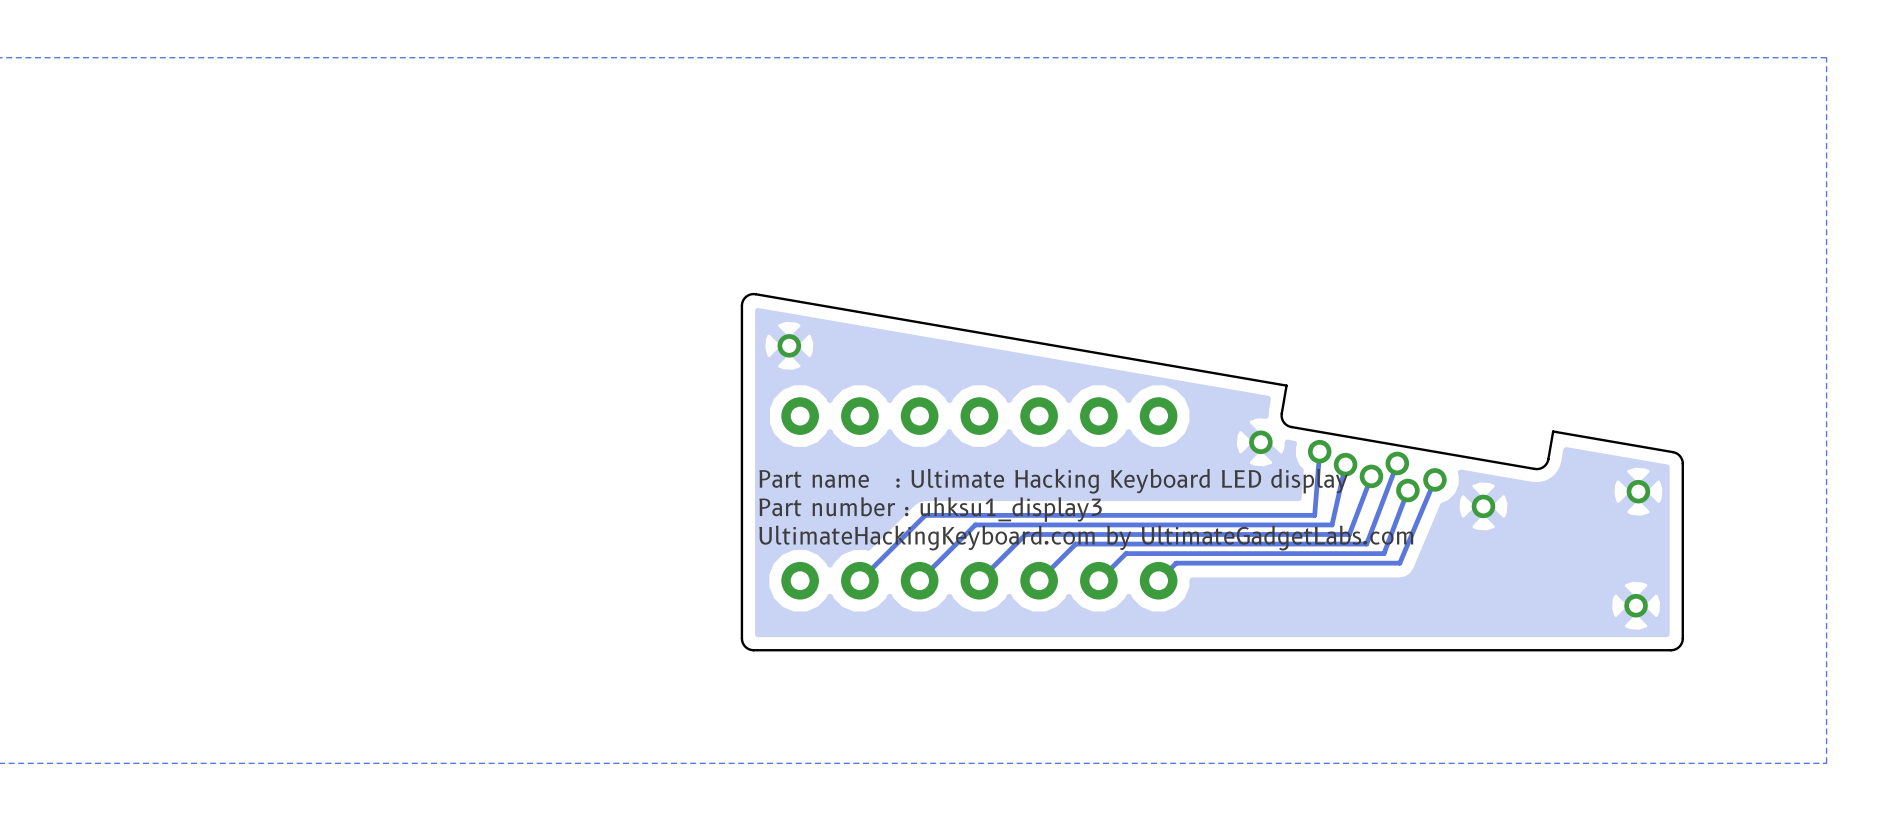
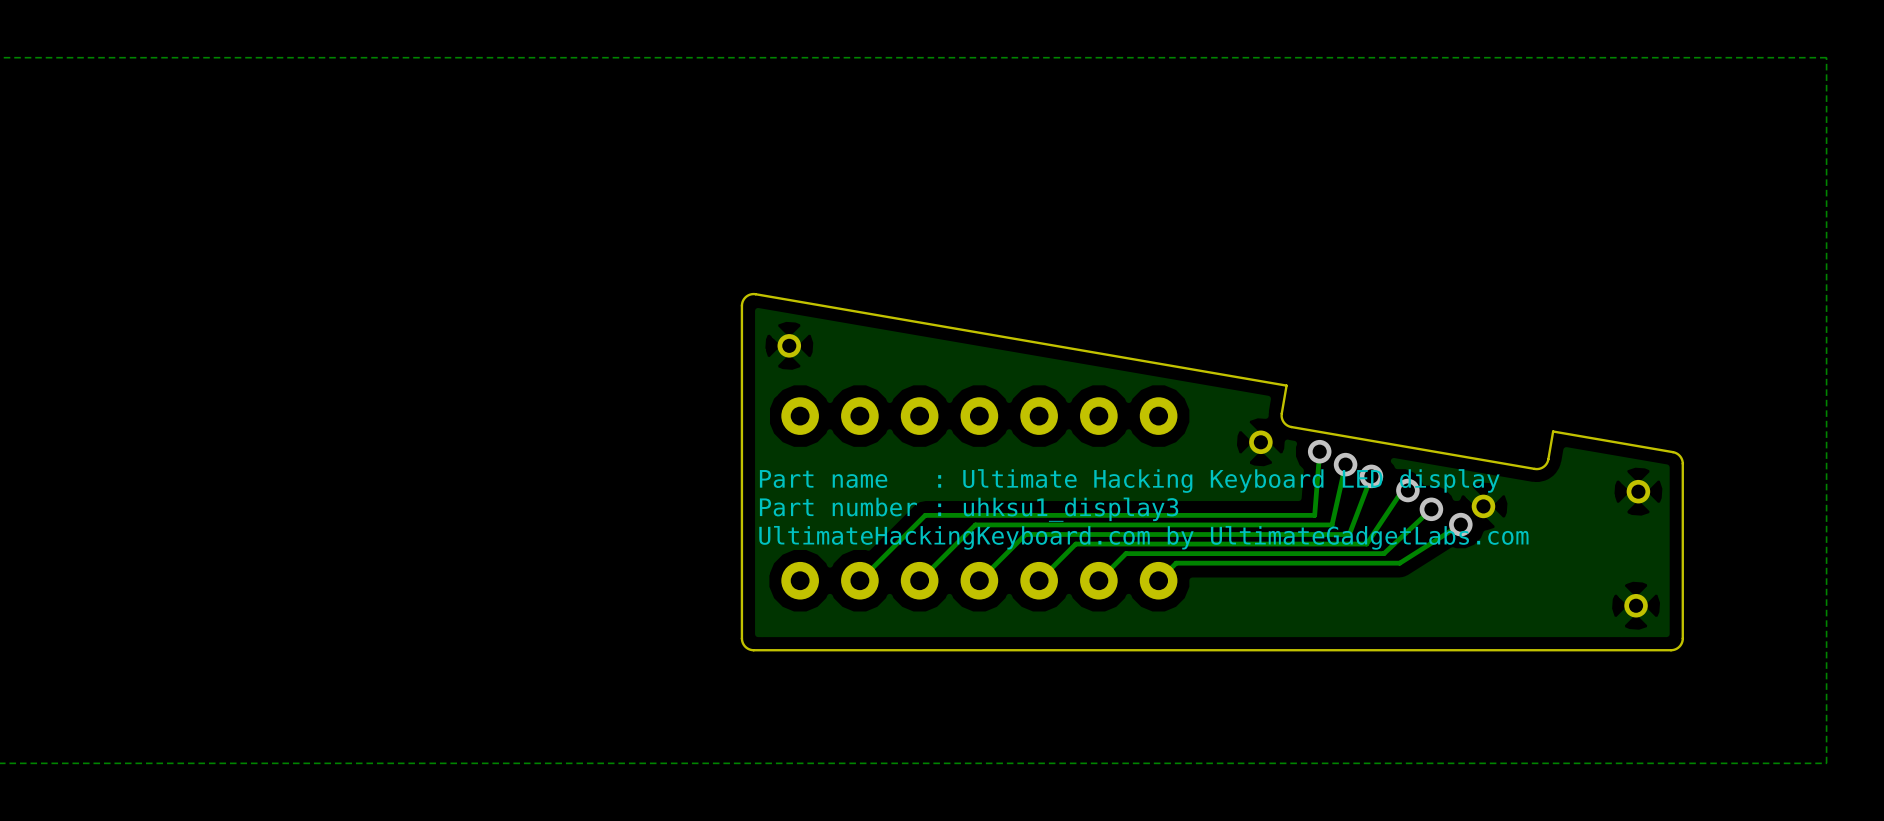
track: (1397, 463) (1366, 544) -> (1400, 492) (1366, 544)
via: (1397, 463) -> none
track: (1434, 479) (1399, 563) -> (1460, 524) (1399, 563)
via: (1434, 479) -> none
track: (1407, 490) (1384, 553) -> (1431, 509) (1384, 553)
via: none -> (1431, 509)
via: none -> (1460, 524)

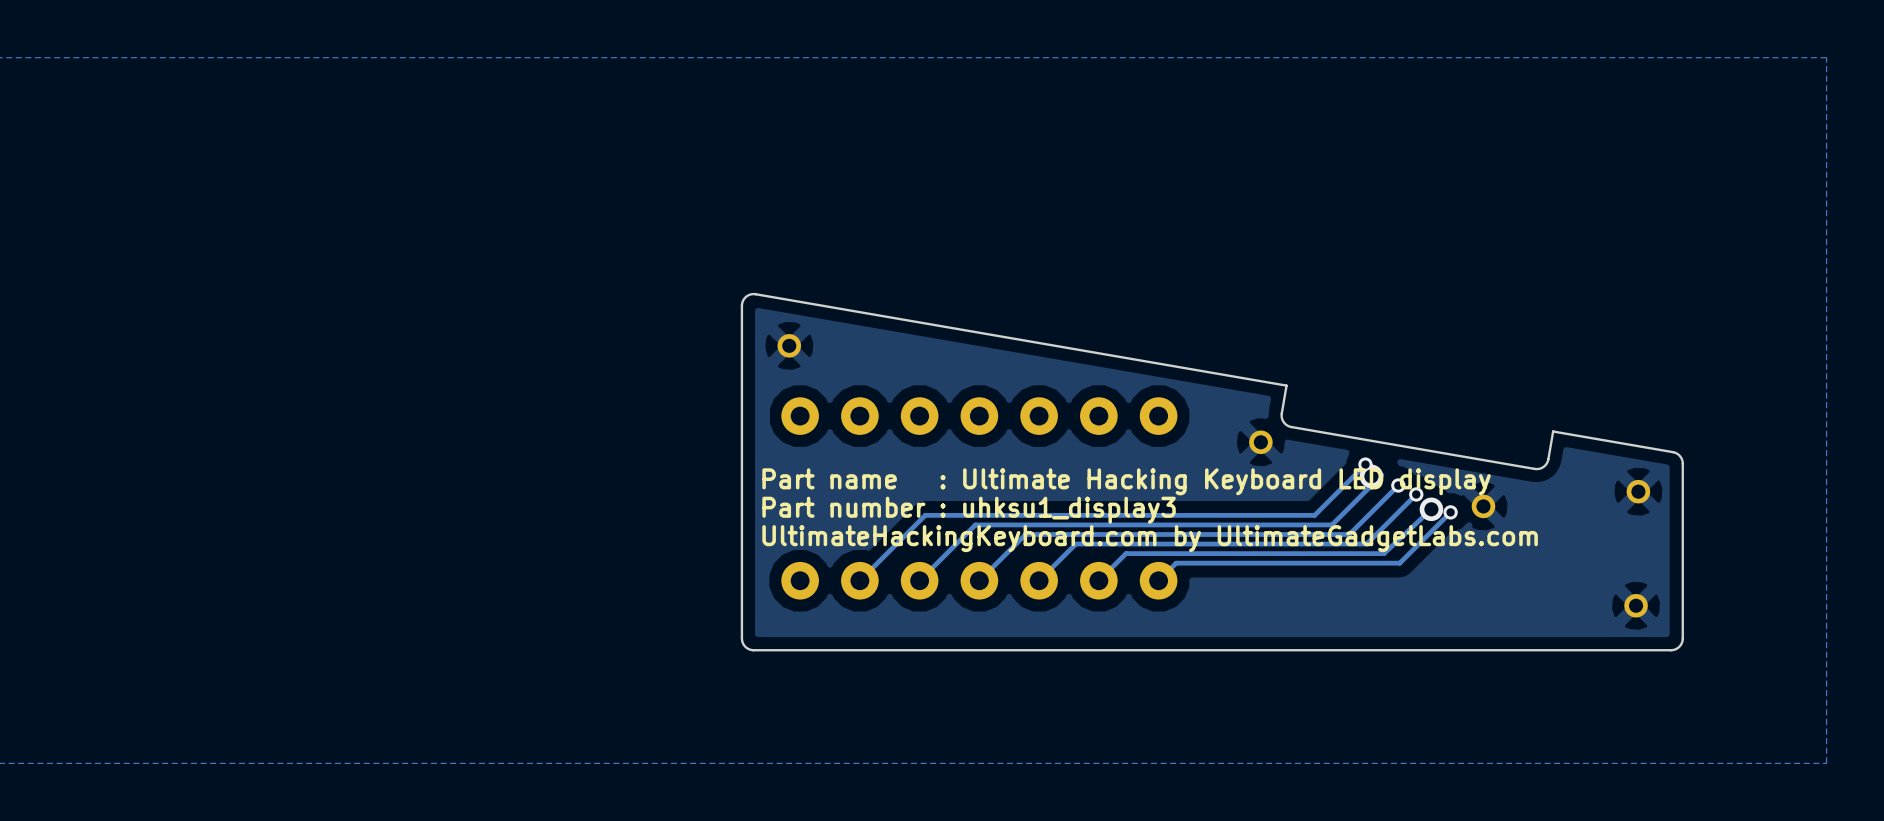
track: (1319, 451) (1314, 515) -> (1365, 464) (1314, 515)
via: (1319, 451) -> none
track: (1345, 464) (1332, 524) -> (1381, 475) (1332, 524)
via: (1345, 464) -> none
via: none -> (1365, 464)
track: (1371, 476) (1349, 534) -> (1398, 485) (1349, 534)
via: none -> (1398, 485)
via: (1407, 490) -> none
track: (1400, 492) (1366, 544) -> (1416, 494) (1366, 544)
via: none -> (1416, 494)
via size: [1449, 512, 1473, 537] -> [1443, 505, 1458, 520]
track: (1460, 524) (1399, 563) -> (1450, 512) (1399, 563)

